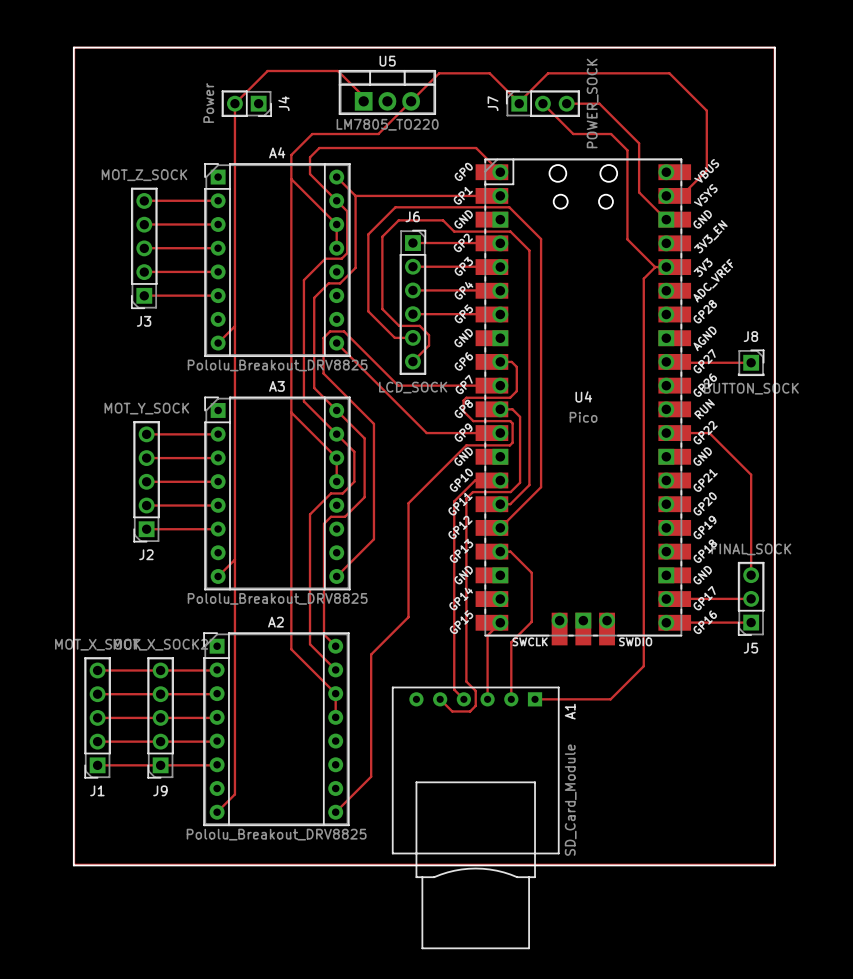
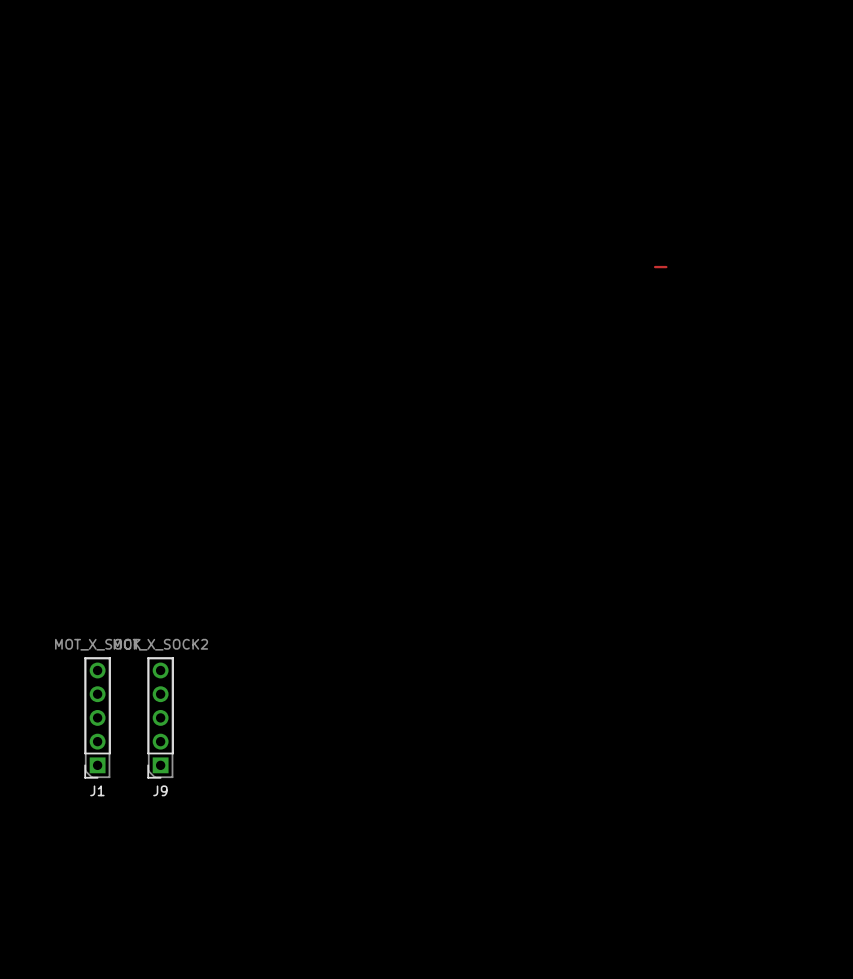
board edge: (73, 47) (774, 47) (774, 865) (73, 865) (73, 47) -> none
top track: (74, 47) (774, 47) (774, 864) (74, 864) (74, 47) -> none
U5: LM7805_TO220 (387, 92) -> none
top track: (363, 101) (363, 96) (338, 71) (267, 71) (234, 103) (234, 794) (217, 812) -> none
top track: (519, 102) (489, 73) (439, 73) (378, 134) (312, 134) (291, 155) (291, 649) (335, 693) (335, 717) -> none
J4: Power (246, 103) -> none
top track: (519, 103) (548, 73) (669, 73) (706, 110) (706, 170) (681, 195) (666, 195) -> none
top track: (542, 103) (573, 134) (611, 134) (627, 150) (627, 239) (655, 267) (643, 278) (643, 666) (610, 699) (535, 699) -> none
J7: POWER_SOCK (542, 103) -> none
top track: (566, 103) (599, 103) (639, 143) (639, 192) (666, 219) -> none
top track: (500, 172) (476, 148) (319, 148) (310, 157) (310, 174) (347, 211) (347, 253) (341, 258) (325, 258) (303, 280) (303, 401) (354, 451) (354, 481) (342, 493) (331, 493) (310, 514) (310, 644) (335, 669) -> none
top track: (336, 177) (355, 195) -> none
top track: (291, 179) (336, 224) (336, 248) -> none
top track: (355, 195) (500, 195) -> none
top track: (355, 195) (355, 267) (340, 283) (328, 283) (314, 297) (314, 387) (364, 438) (364, 497) (345, 516) (331, 516) (324, 523) (324, 634) (335, 646) -> none
top track: (218, 200) (144, 200) -> none
top track: (218, 224) (144, 224) -> none
top track: (412, 243) (500, 243) -> none
J3: MOT_Z_SOCK (144, 248) -> none
top track: (218, 248) (144, 248) -> none
A4: Pololu_Breakout_DRV8825 (277, 260) -> none
top track: (412, 266) (500, 267) -> none
top track: (218, 271) (144, 272) -> none
top track: (412, 290) (500, 290) -> none
top track: (218, 295) (144, 295) -> none
J6: LCD_SOCK (412, 302) -> none
top track: (412, 314) (500, 314) -> none
top track: (234, 326) (218, 343) -> none
top track: (412, 337) (394, 337) (368, 311) (368, 234) (395, 207) (509, 207) (541, 239) (541, 487) (500, 527) -> none
top track: (336, 343) (426, 433) (500, 433) -> none
top track: (412, 361) (429, 345) (429, 335) (419, 325) (399, 325) (382, 309) (382, 236) (398, 220) (443, 220) (454, 231) (510, 231) (529, 250) (529, 485) (510, 504) (500, 504) -> none
top track: (500, 361) (511, 361) (516, 366) (516, 391) (510, 397) (466, 397) (463, 400) (463, 411) (473, 421) (510, 421) (512, 423) (512, 442) (509, 445) (466, 445) (408, 503) (408, 617) (371, 654) (371, 776) (335, 812) -> none
top track: (666, 361) (751, 362) -> none
J8: BUTTON_SOCK (751, 362) -> none
top track: (500, 385) (398, 385) (344, 331) (330, 331) (323, 338) (323, 373) (373, 423) (373, 539) (336, 576) -> none
U4: Pico (583, 402) -> none
top track: (500, 409) (512, 409) (520, 416) (520, 482) (510, 492) (472, 492) (466, 498) (466, 681) (475, 690) (475, 705) (470, 711) (452, 711) (440, 699) -> none
top track: (291, 412) (336, 457) (336, 481) -> none
top track: (666, 433) (709, 433) (751, 474) (751, 575) -> none
top track: (218, 434) (146, 434) -> none
top track: (218, 457) (146, 458) -> none
top track: (500, 480) (475, 480) (454, 501) (454, 689) (463, 699) -> none
J2: MOT_Y_SOCK (146, 481) -> none
top track: (218, 481) (146, 481) -> none
A3: Pololu_Breakout_DRV8825 (277, 493) -> none
top track: (218, 505) (146, 505) -> none
top track: (218, 529) (146, 529) -> none
top track: (500, 551) (510, 551) (531, 572) (531, 621) (511, 642) (511, 699) -> none
top track: (234, 559) (218, 576) -> none
top track: (751, 598) (666, 599) -> none
J5: FINAL_SOCK (751, 598) -> none
top track: (500, 622) (487, 635) (487, 699) -> none
top track: (751, 622) (666, 622) -> none
top track: (217, 669) (97, 670) -> none
top track: (217, 693) (97, 694) -> none
top track: (217, 717) (97, 717) -> none
A2: Pololu_Breakout_DRV8825 (276, 729) -> none
top track: (217, 741) (97, 741) -> none
top track: (217, 764) (97, 765) -> none
A1: SD_Card_Module (475, 817) -> none

